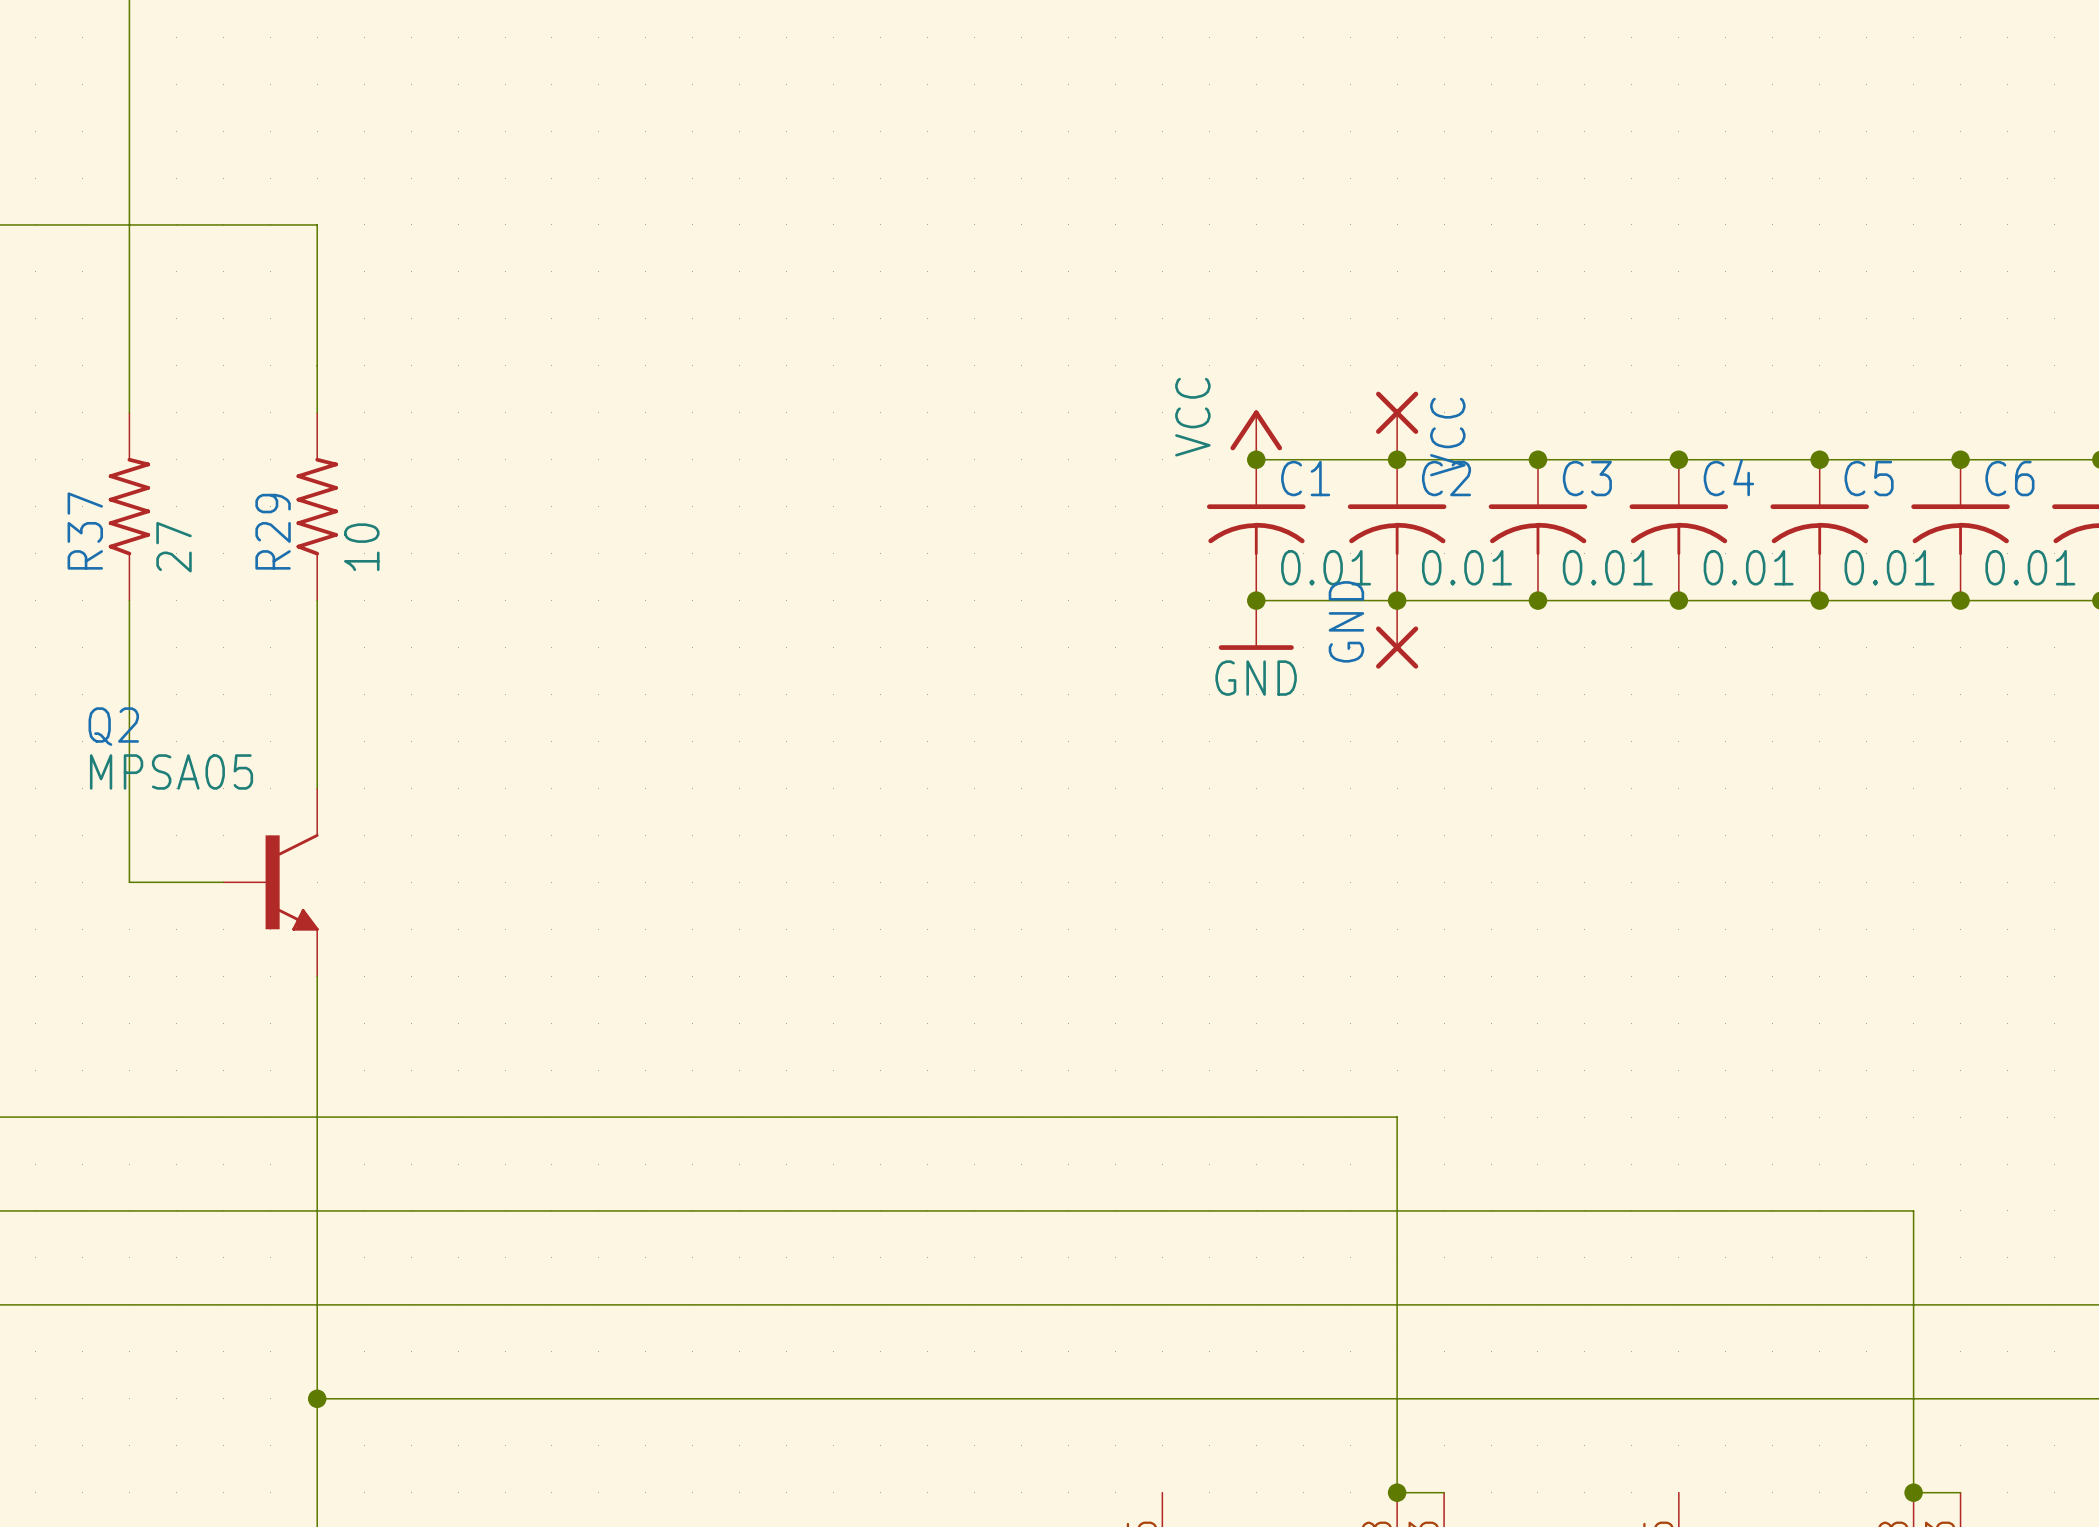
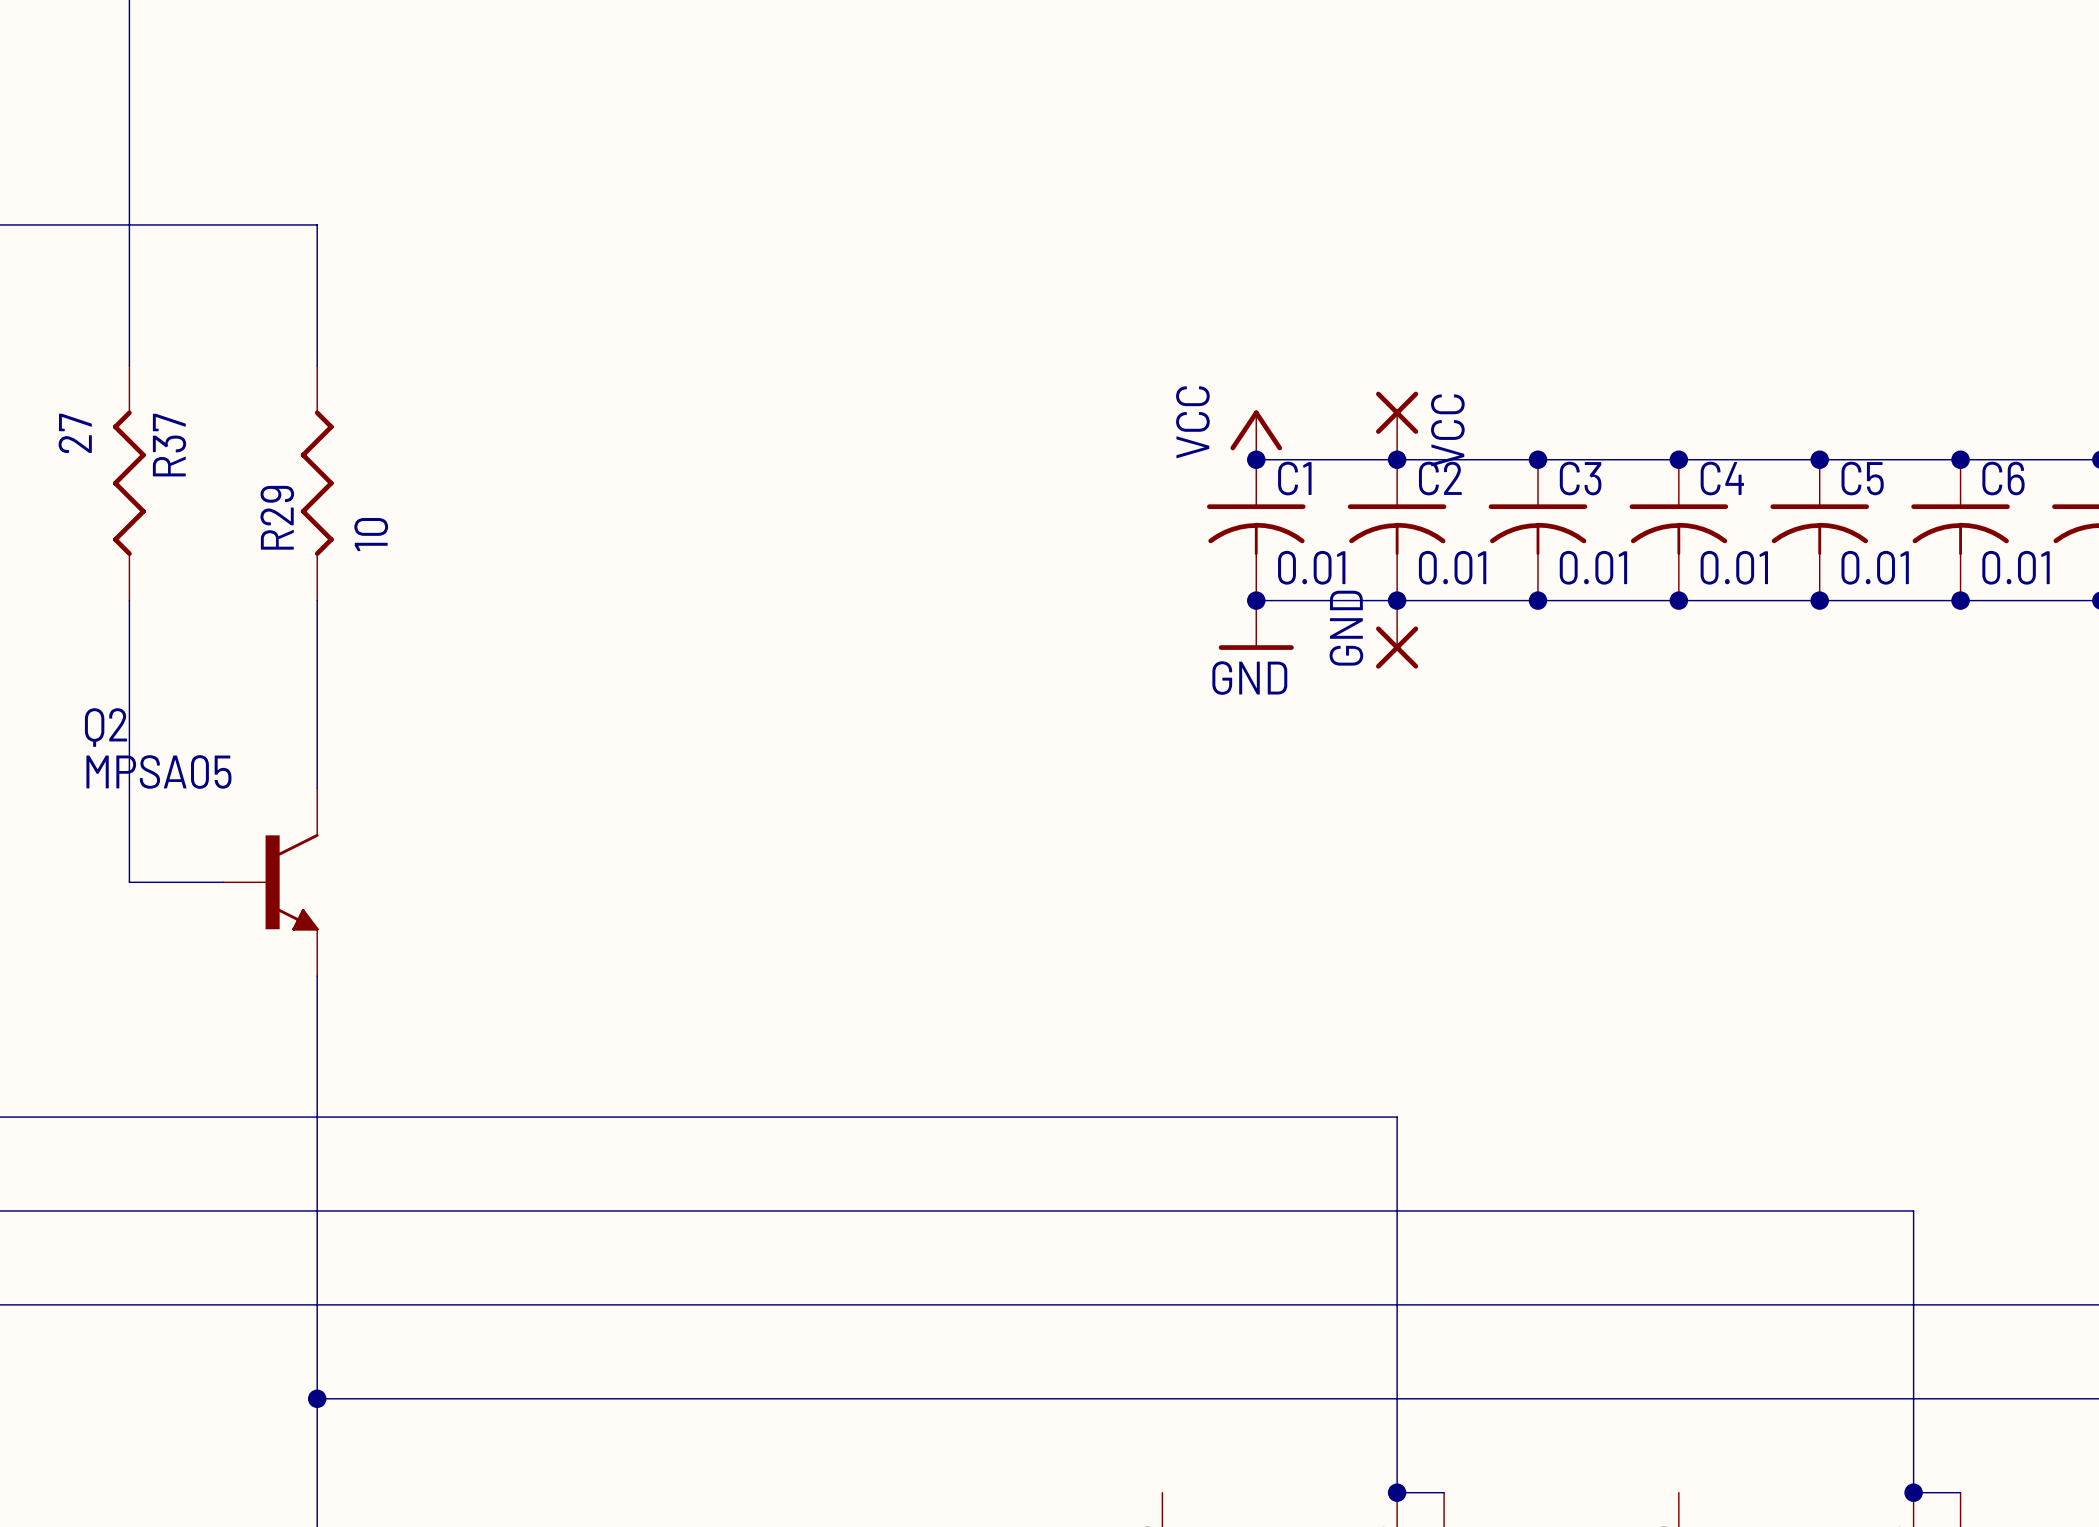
R37 symbol: [108, 412, 151, 601] -> [112, 365, 146, 601]
R29 symbol: [296, 412, 338, 601] -> [300, 365, 334, 601]
R37 name position: R37 (85, 531) -> R37 (169, 445)
R37 value position: 27 (174, 547) -> 27 (75, 433)

